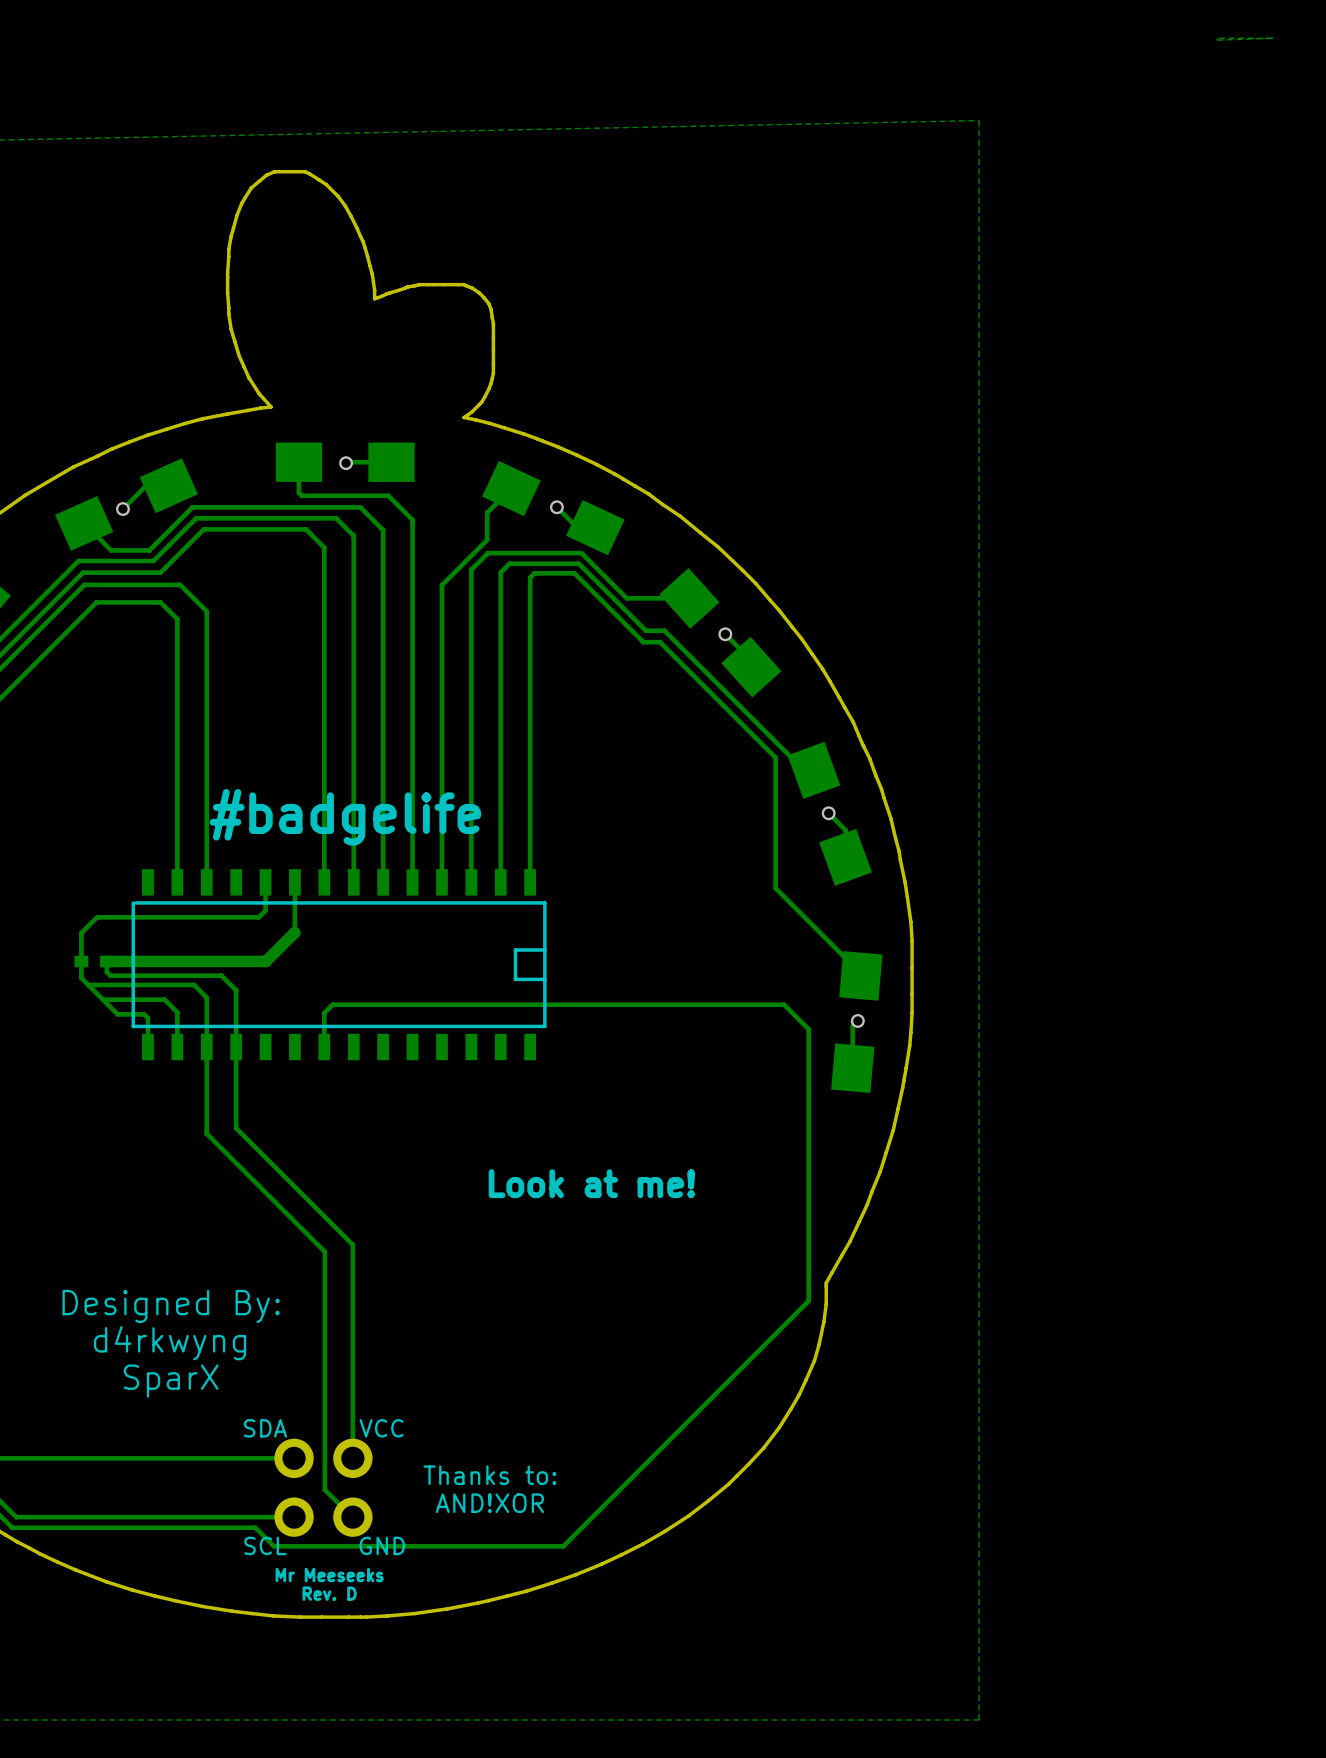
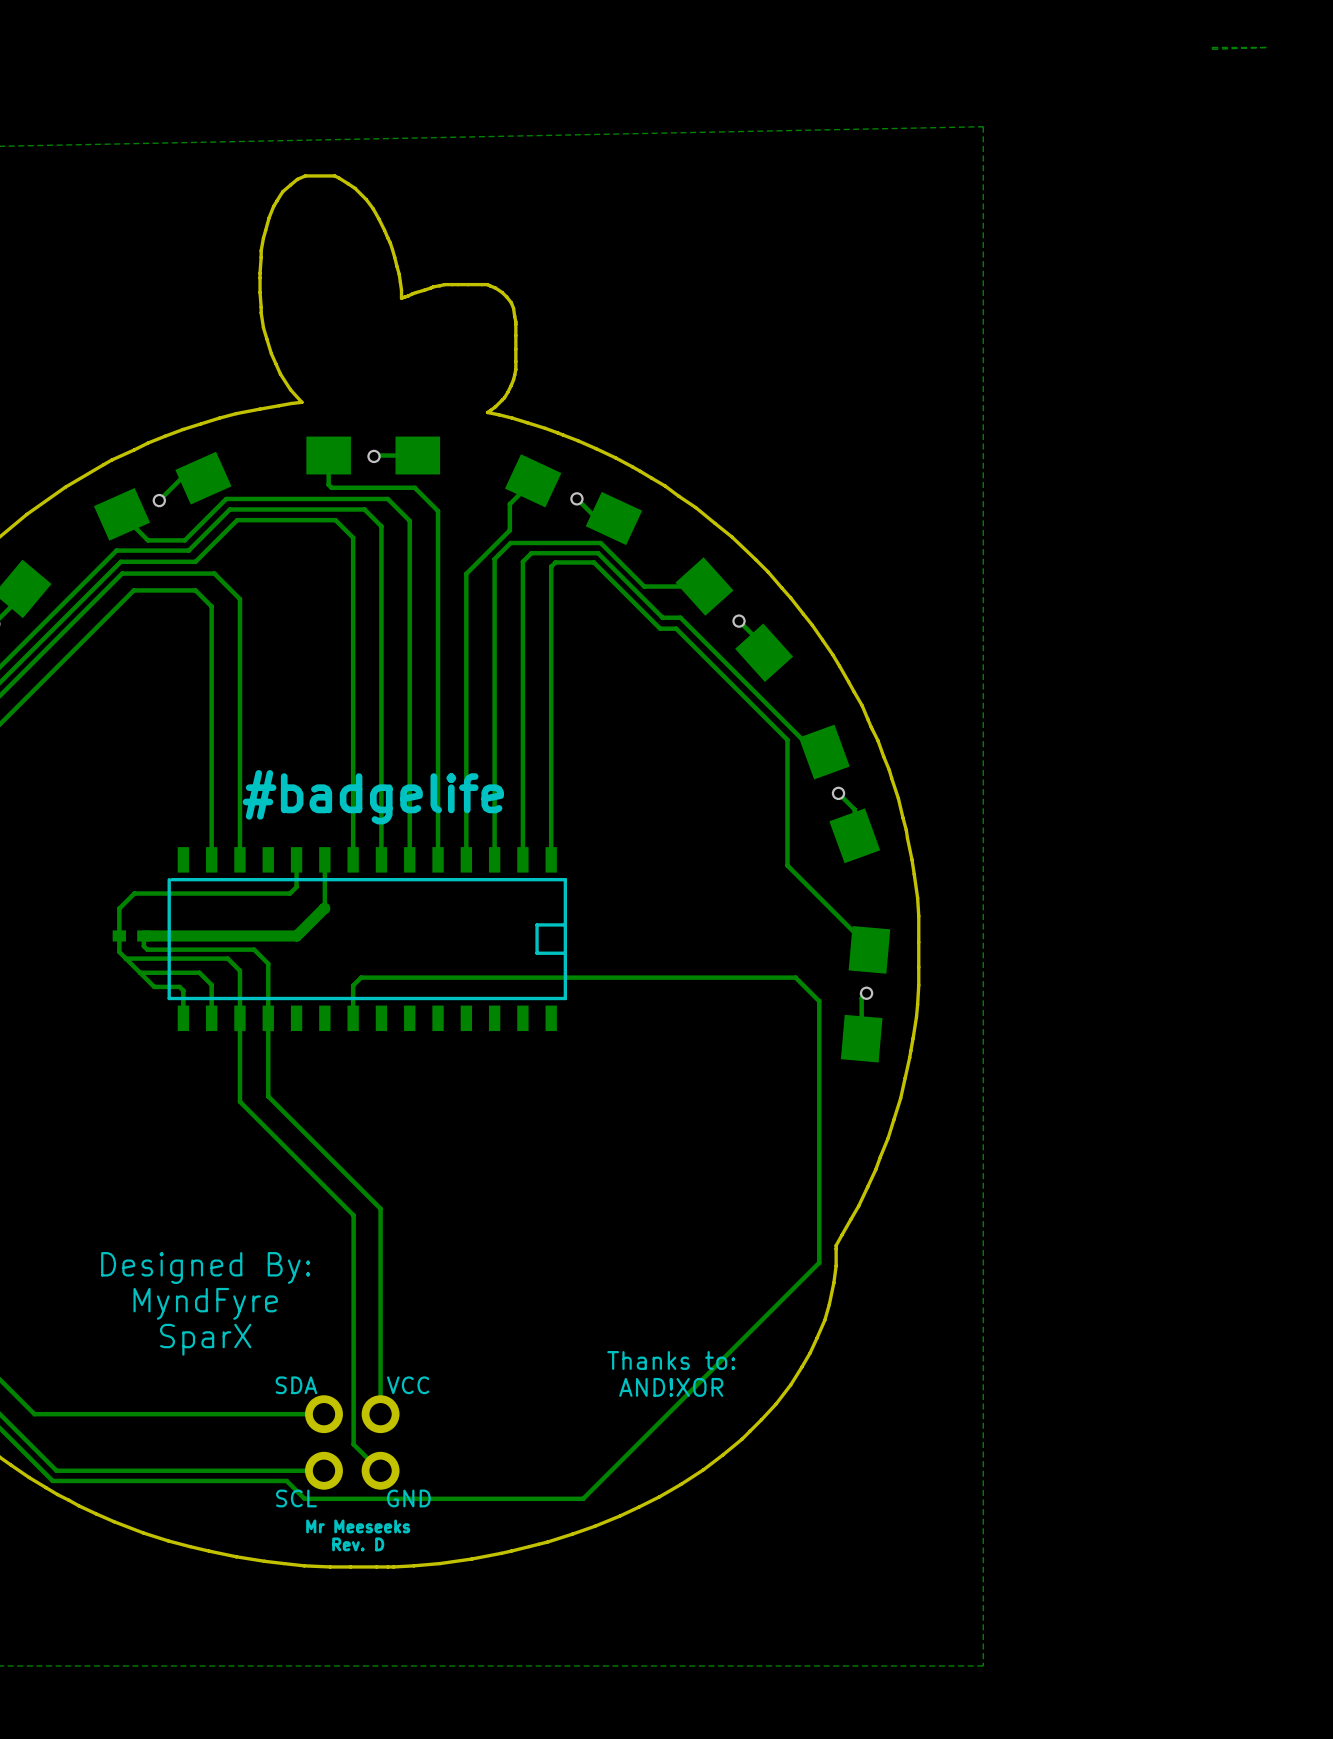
text: Look at me! (591, 1183) -> none
text: d4rkwyng (170, 1343) -> MyndFyre (205, 1303)
text position: Thanks to: (489, 1475) -> Thanks to: (671, 1360)
text position: AND!XOR (489, 1503) -> AND!XOR (671, 1387)

